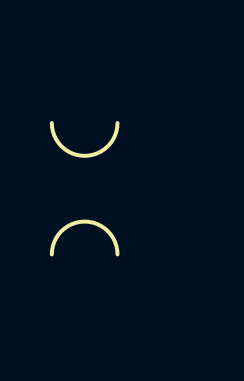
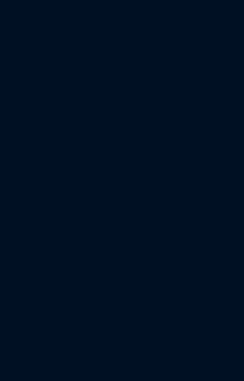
line: (51, 123) (54, 135) (61, 146) (72, 153) (84, 155) (97, 153) (107, 146) (115, 135) (117, 123) -> none
line: (51, 254) (54, 241) (61, 231) (72, 224) (84, 221) (97, 224) (107, 231) (115, 241) (117, 254) -> none

